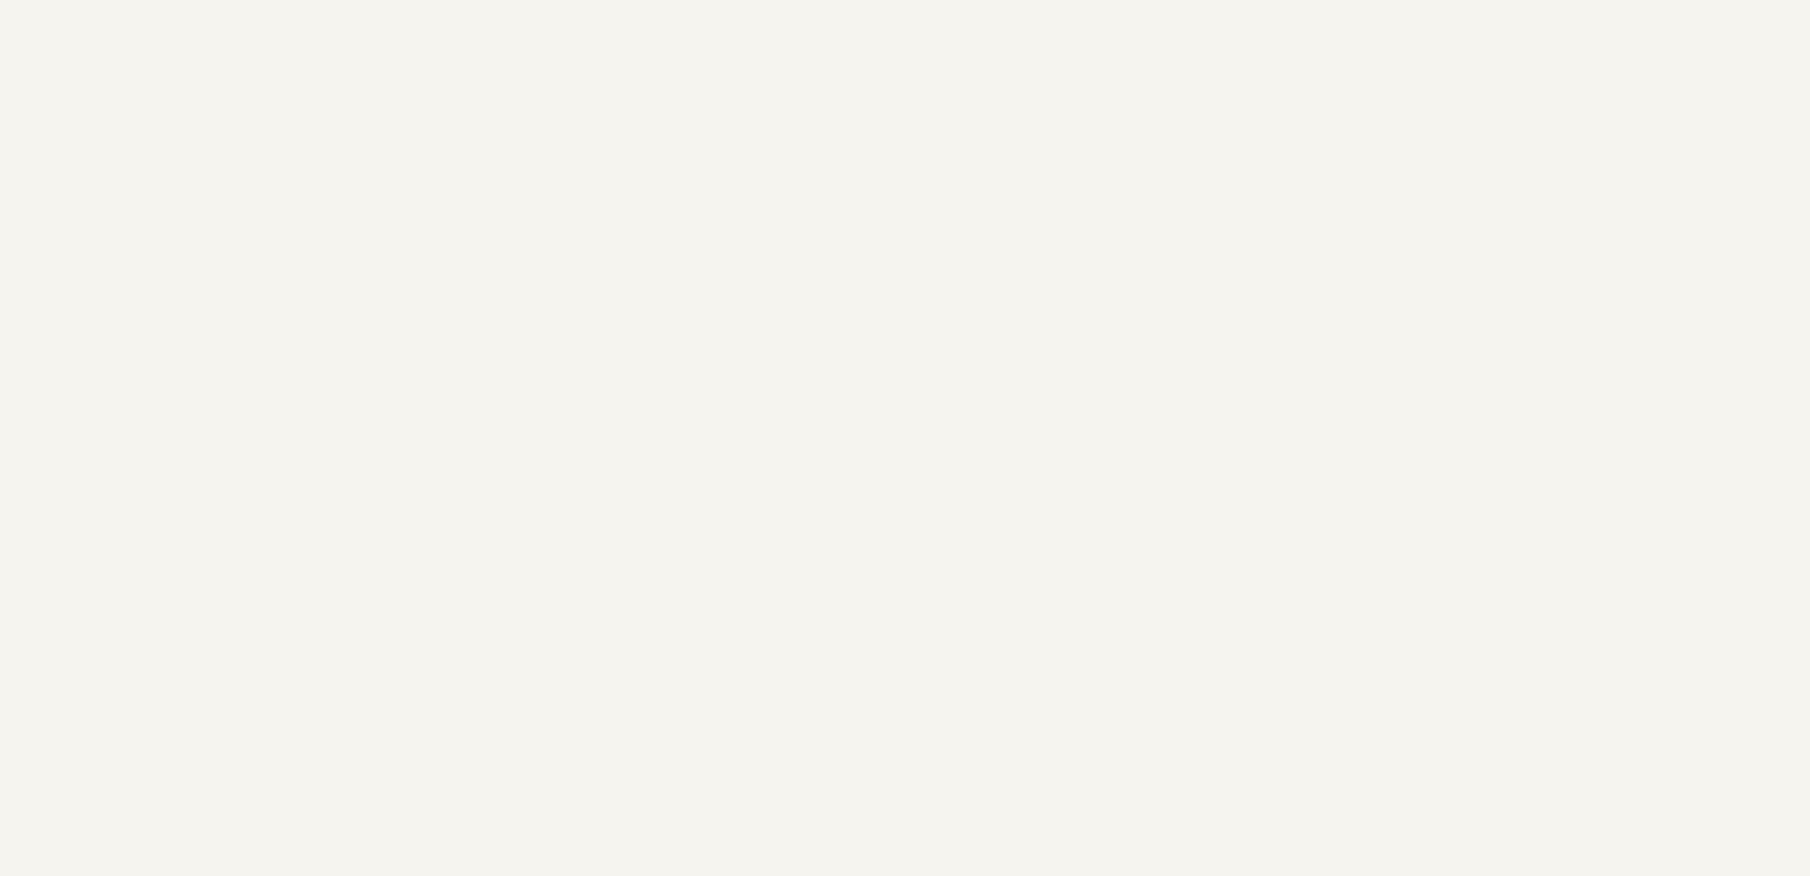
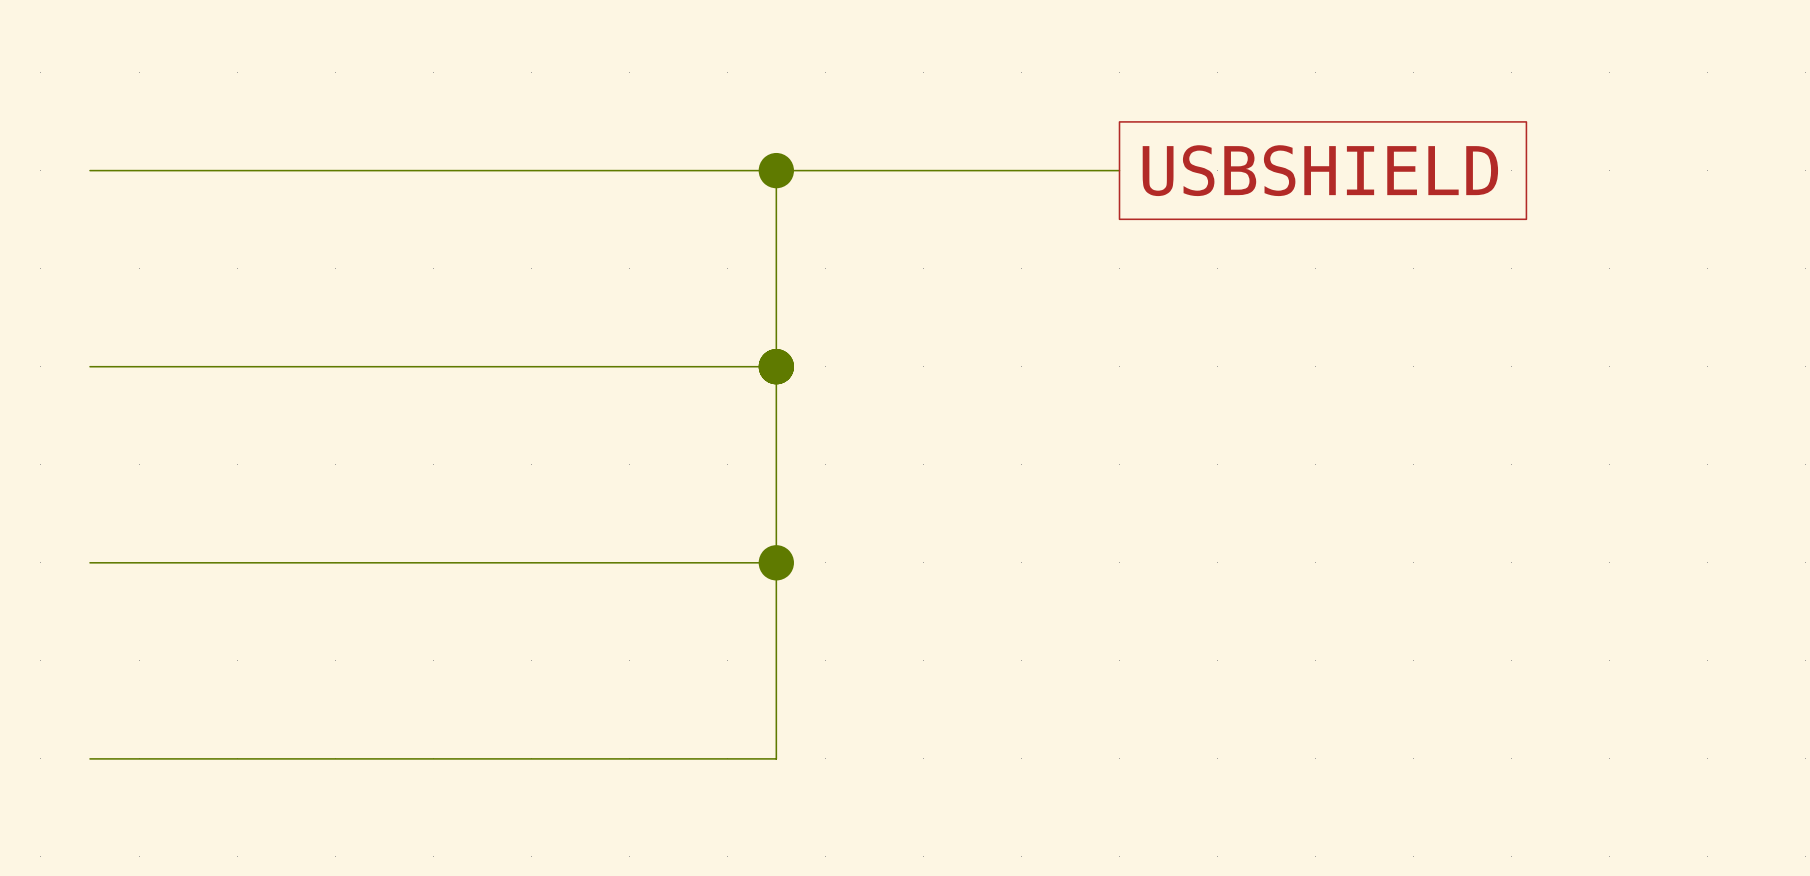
wire: none -> (89, 170) (1119, 170)
wire: none -> (776, 170) (776, 758) (89, 758)
junction: none -> (776, 170)
global label: none -> USBSHIELD (1320, 170)
wire: none -> (89, 366) (776, 366)
junction: none -> (776, 366)
wire: none -> (89, 562) (776, 562)
junction: none -> (776, 562)

